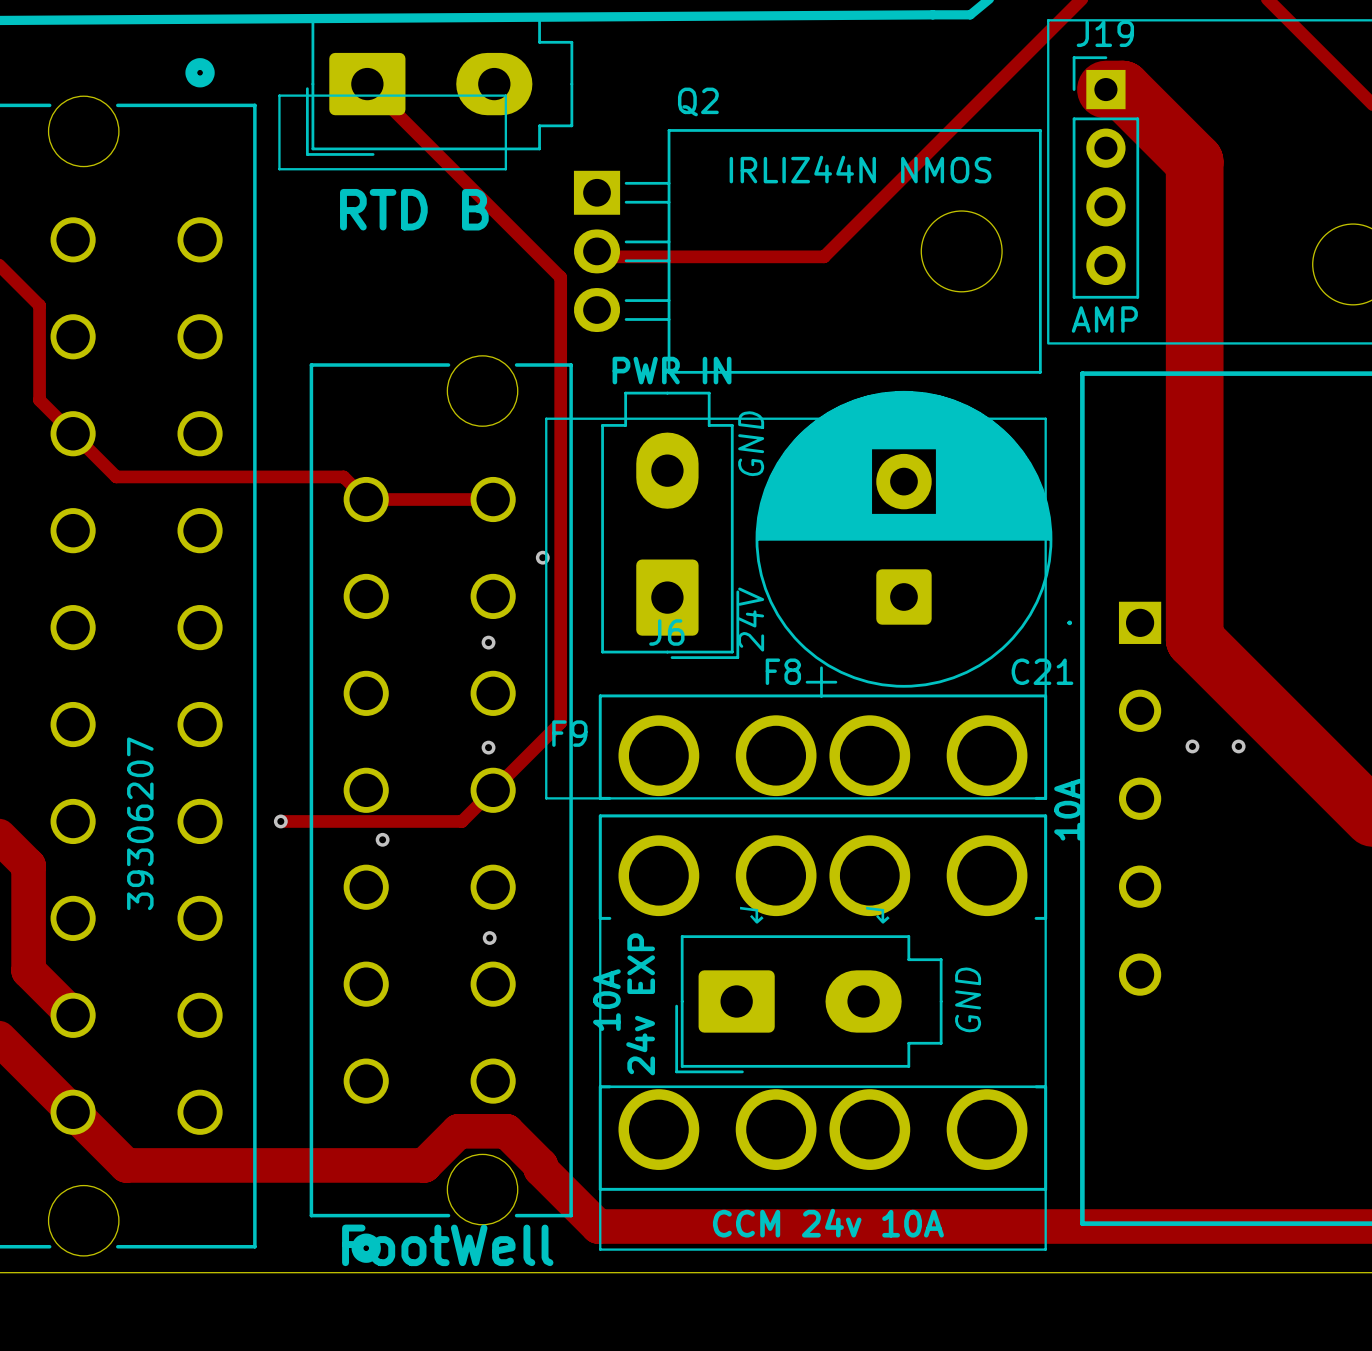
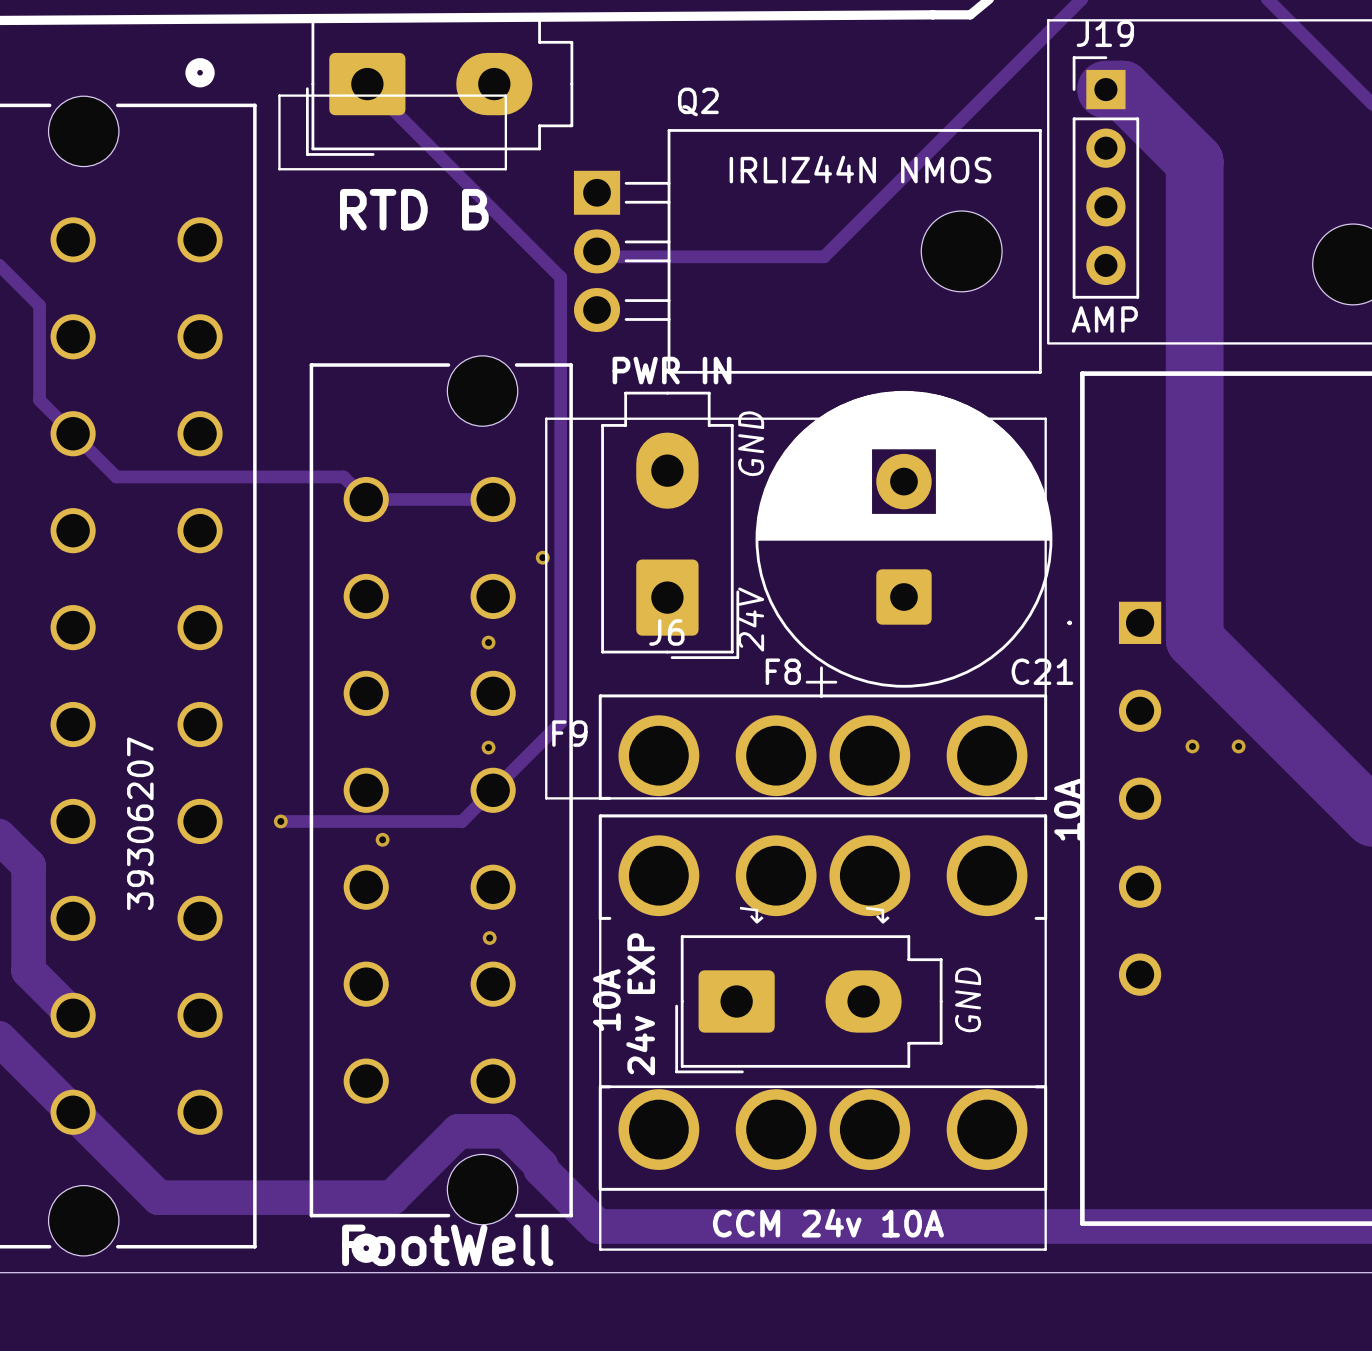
track: (126, 1165) (424, 1165) -> (126, 1165) (158, 1197) (392, 1197) (424, 1165)

